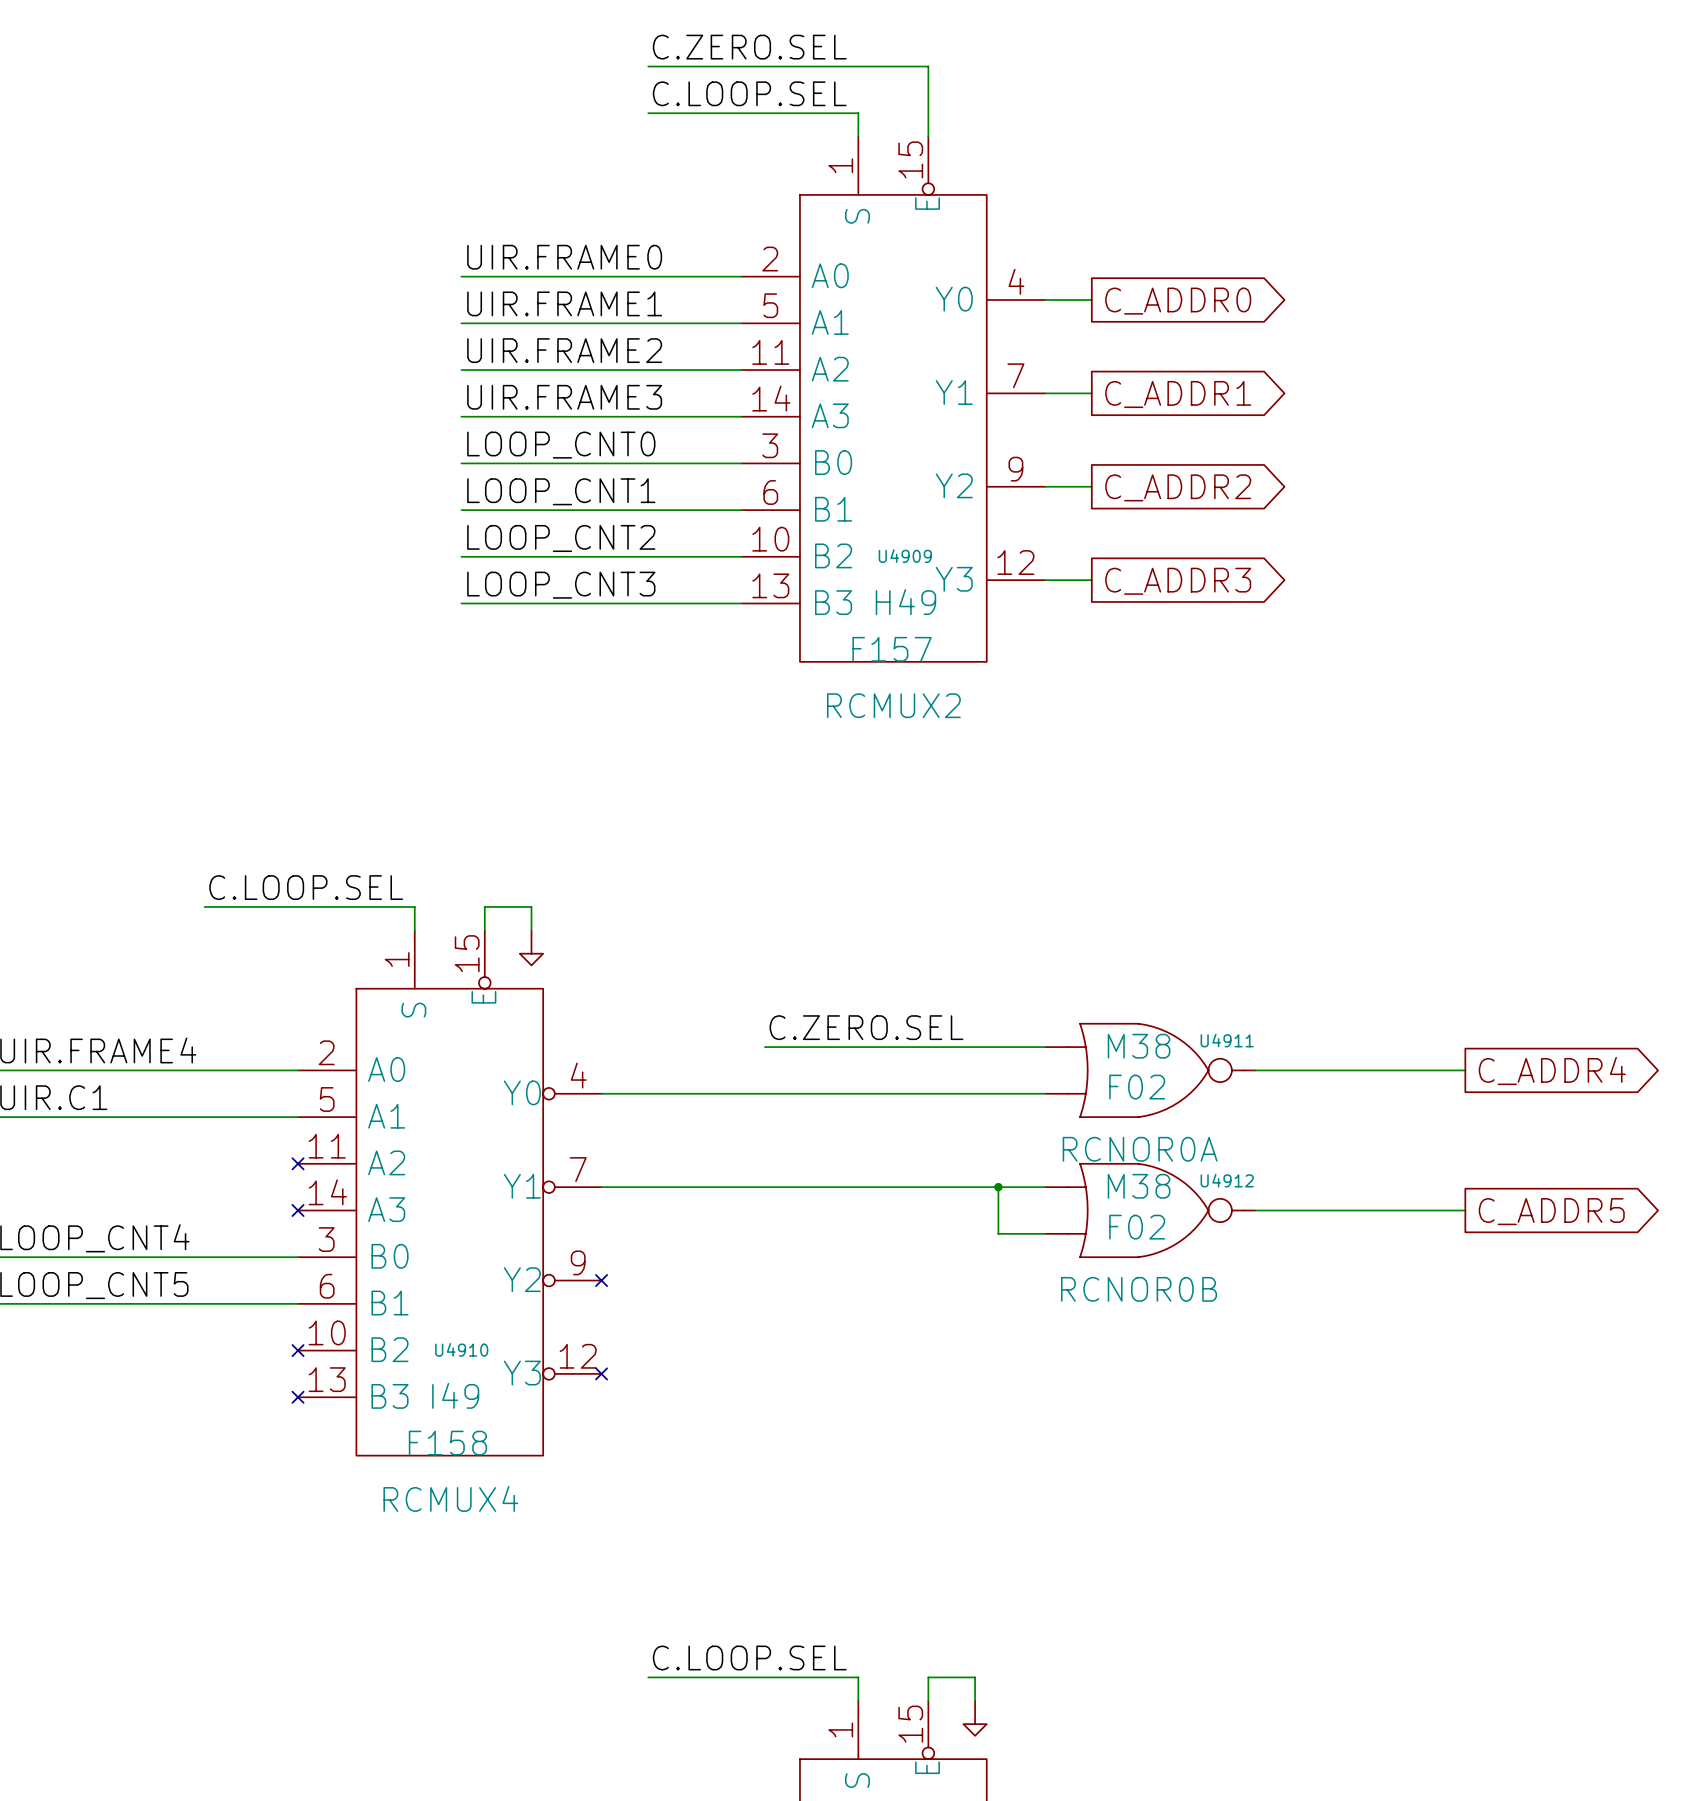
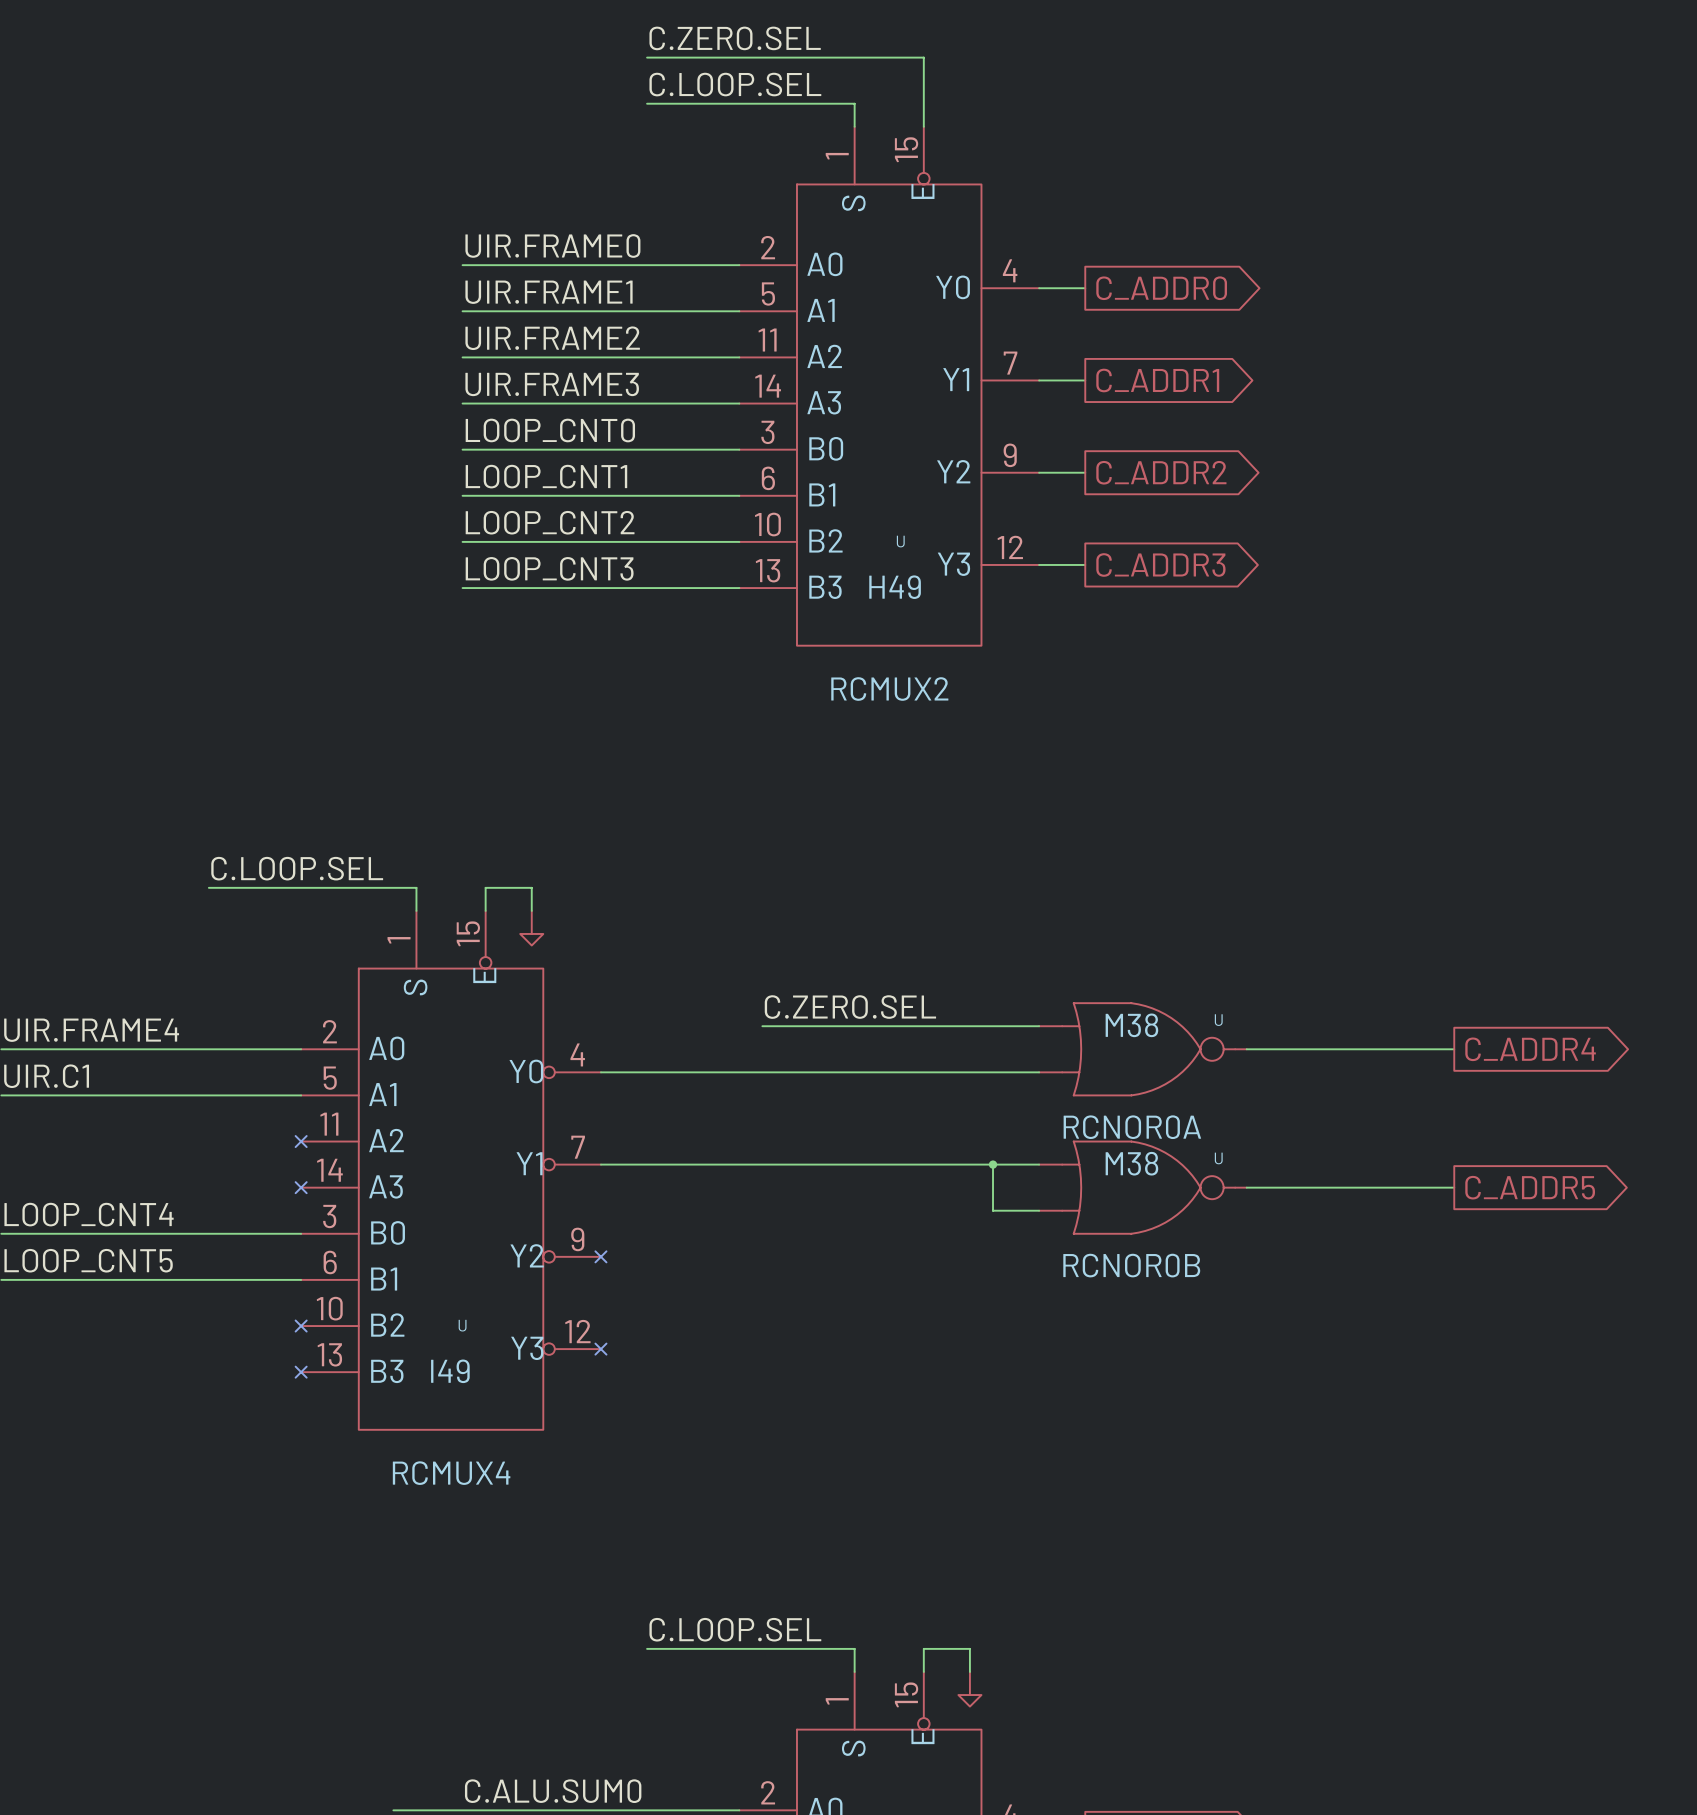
U4909 name: U4909 (905, 556) -> U (900, 541)
U4909 value: F157 (892, 649) -> none
U4911 name: U4911 (1227, 1040) -> U (1218, 1020)
U4911 value: F02 (1137, 1087) -> none
U4912 name: U4912 (1227, 1180) -> U (1218, 1158)
U4912 value: F02 (1137, 1227) -> none
U4910 name: U4910 (461, 1349) -> U (462, 1325)
U4910 value: F158 (447, 1443) -> none

